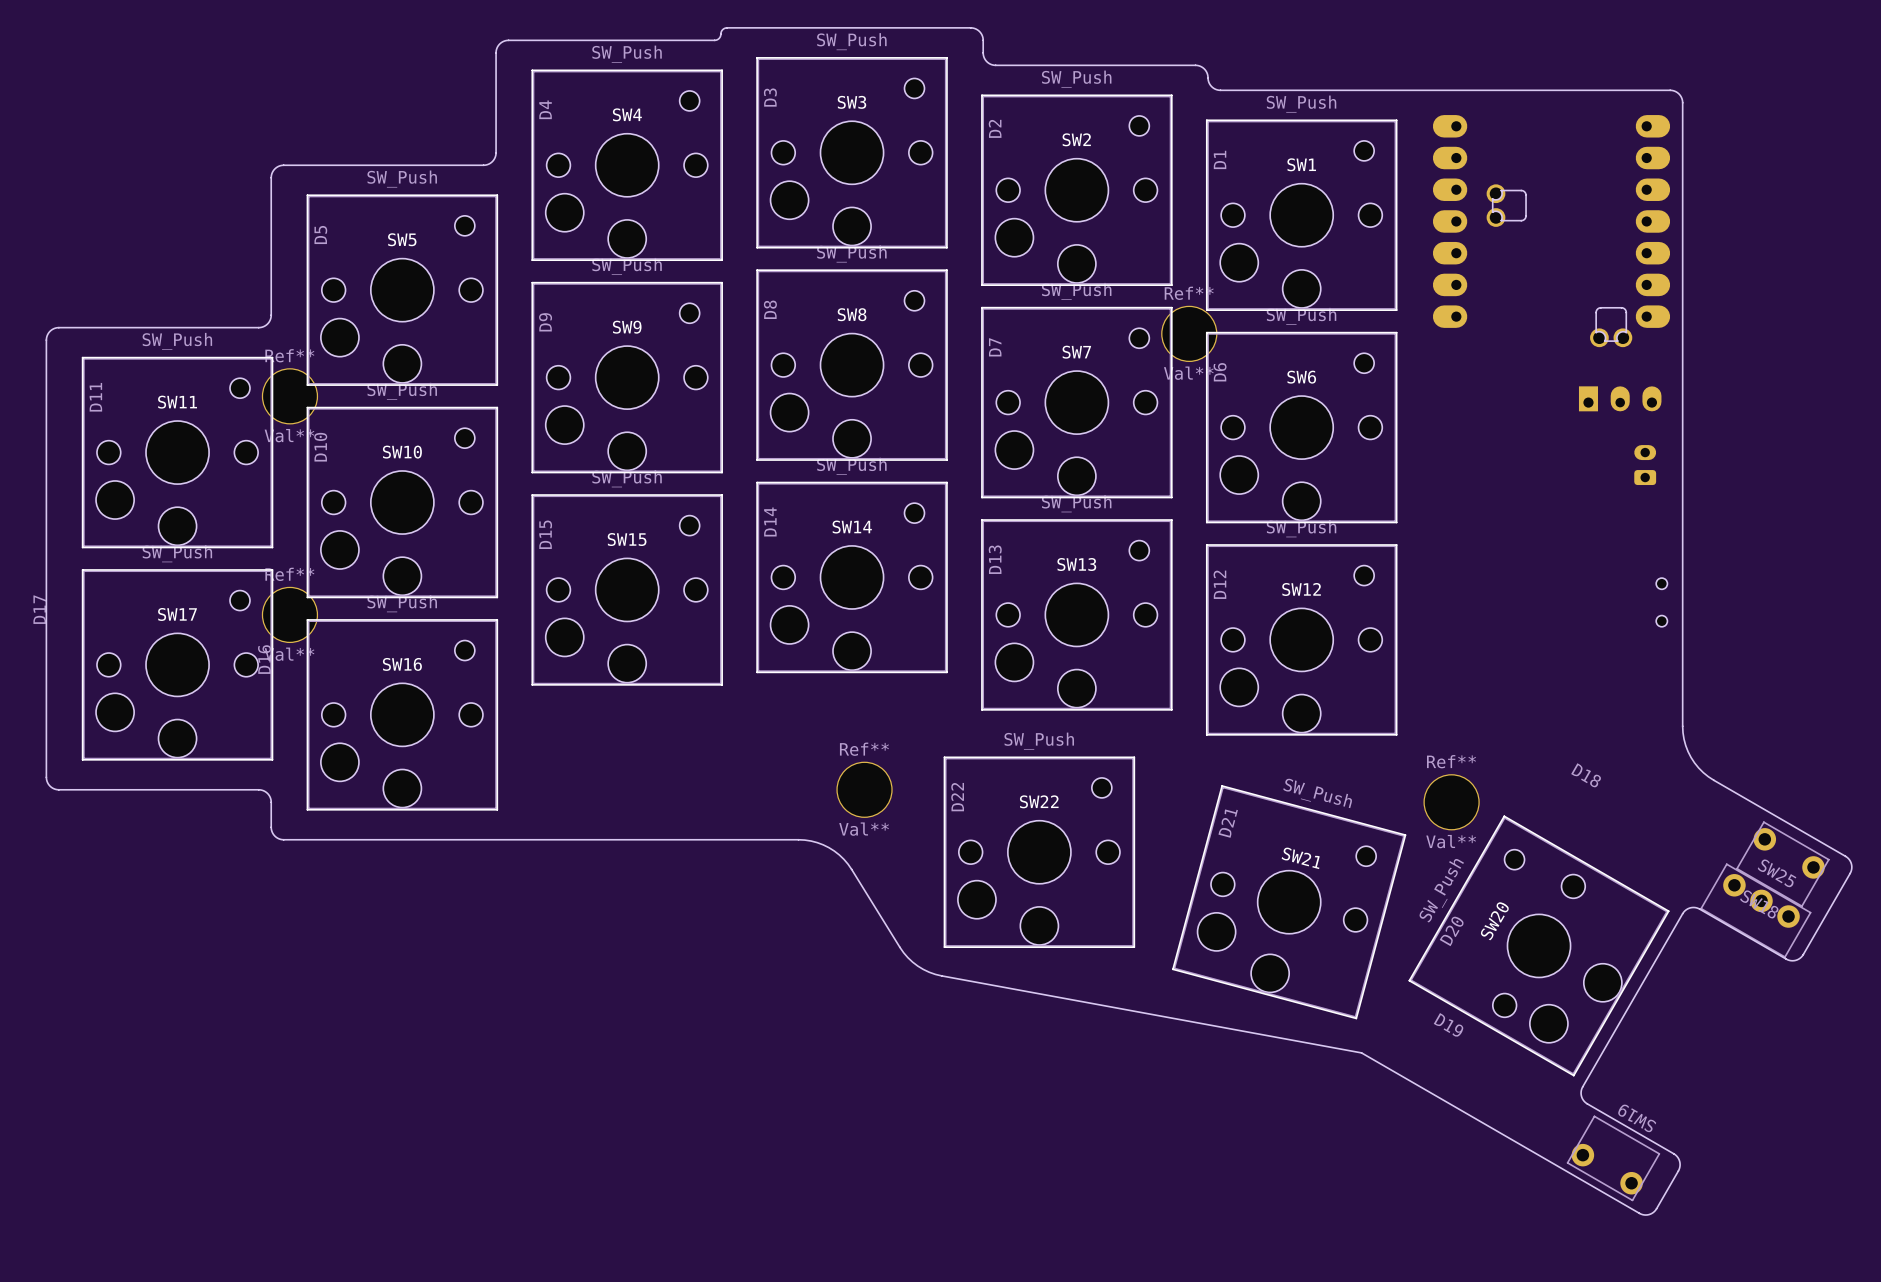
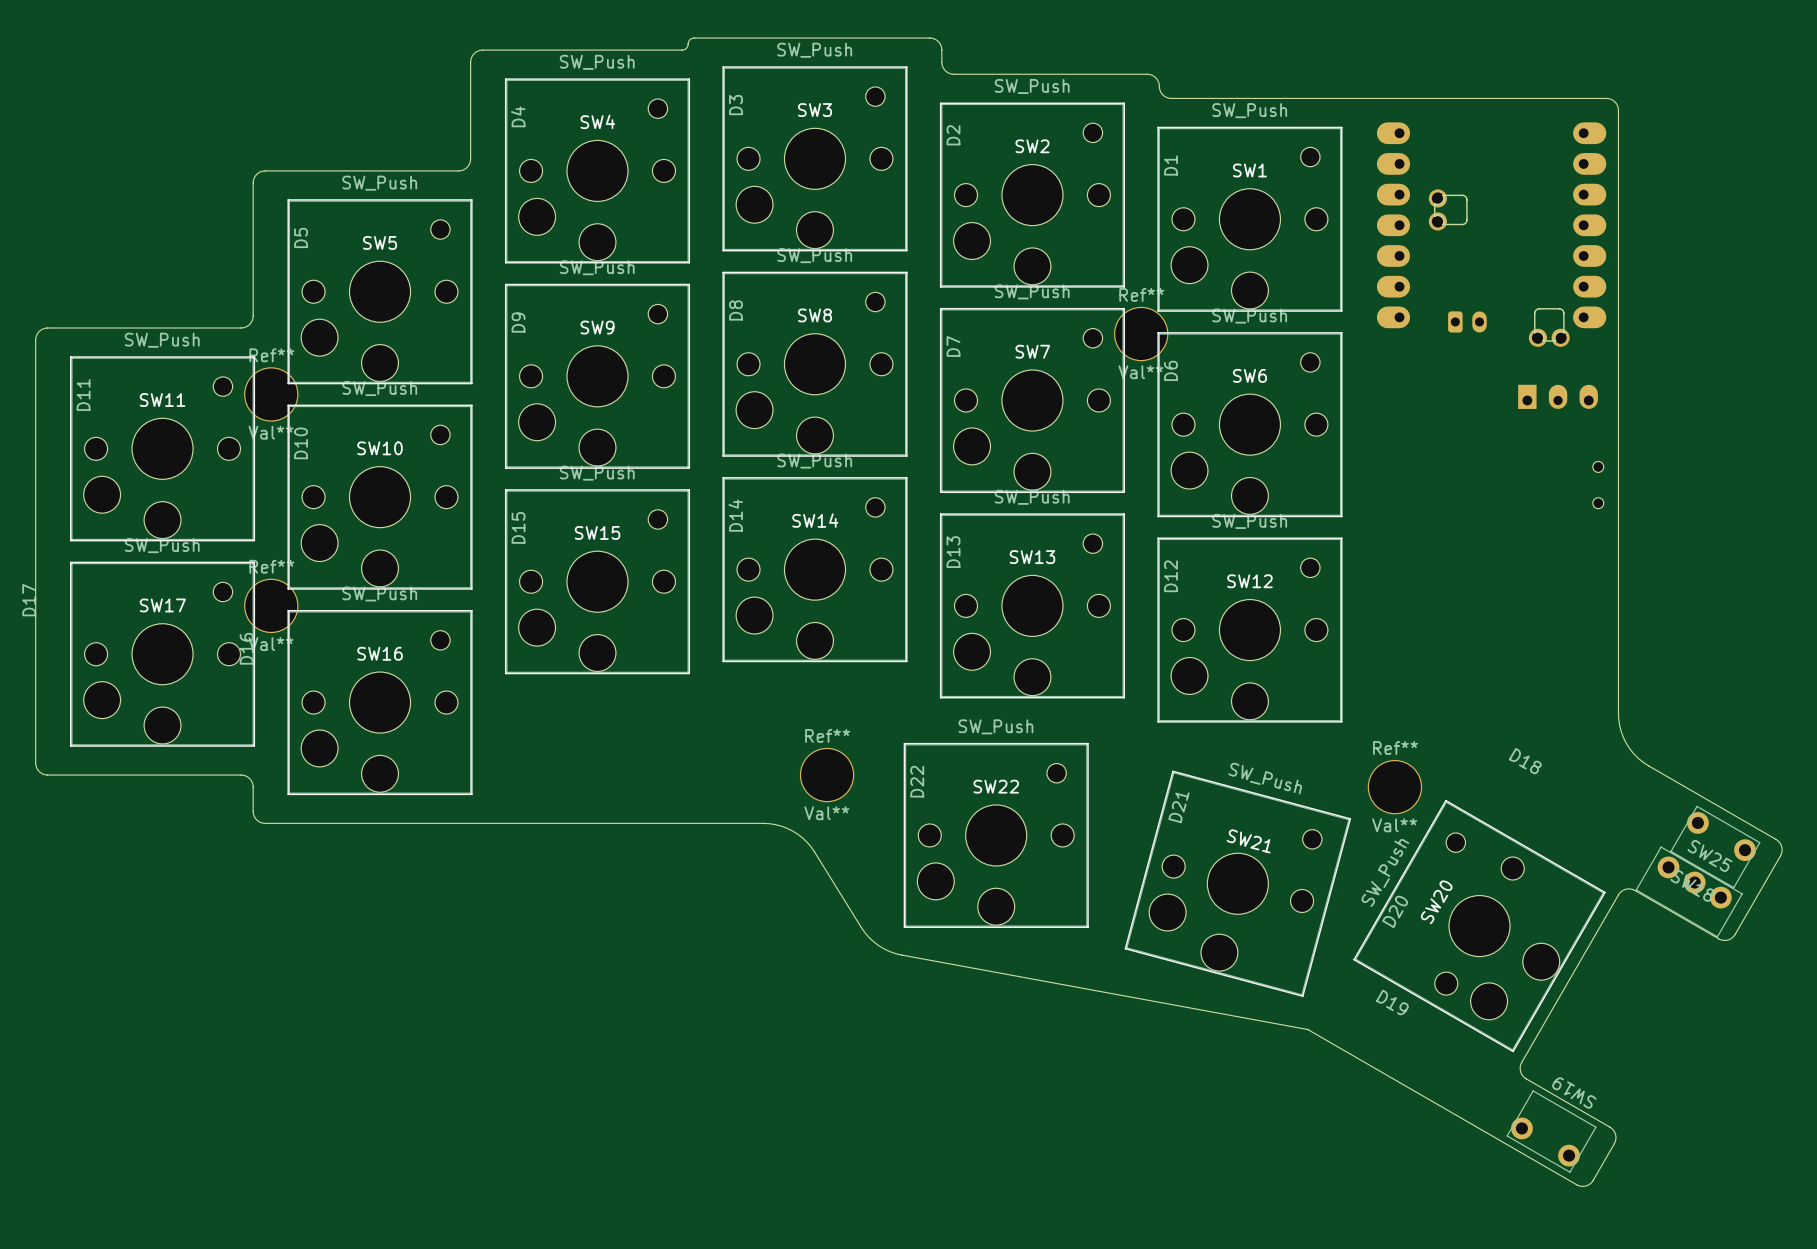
part rotation: 0° (1645, 465) -> 90° clockwise (1467, 321)
part position: (1645, 465) -> (1467, 321)
part position: (1661, 602) -> (1598, 485)

